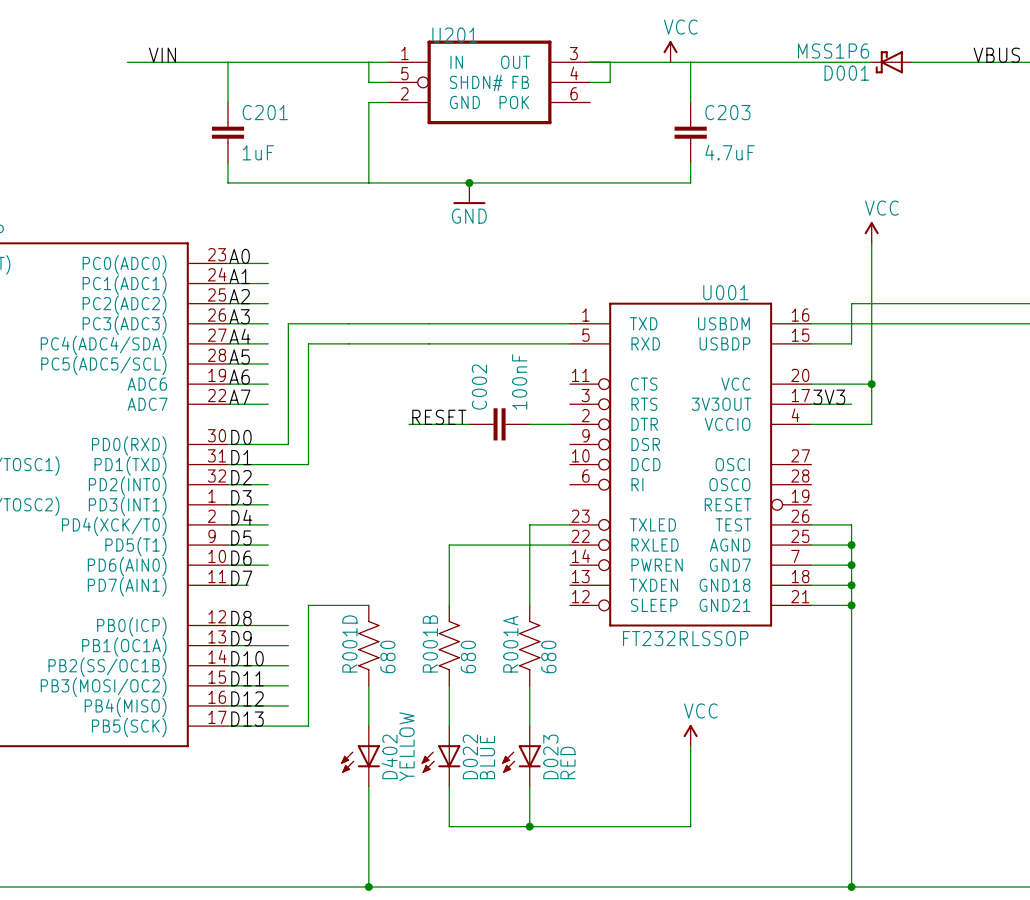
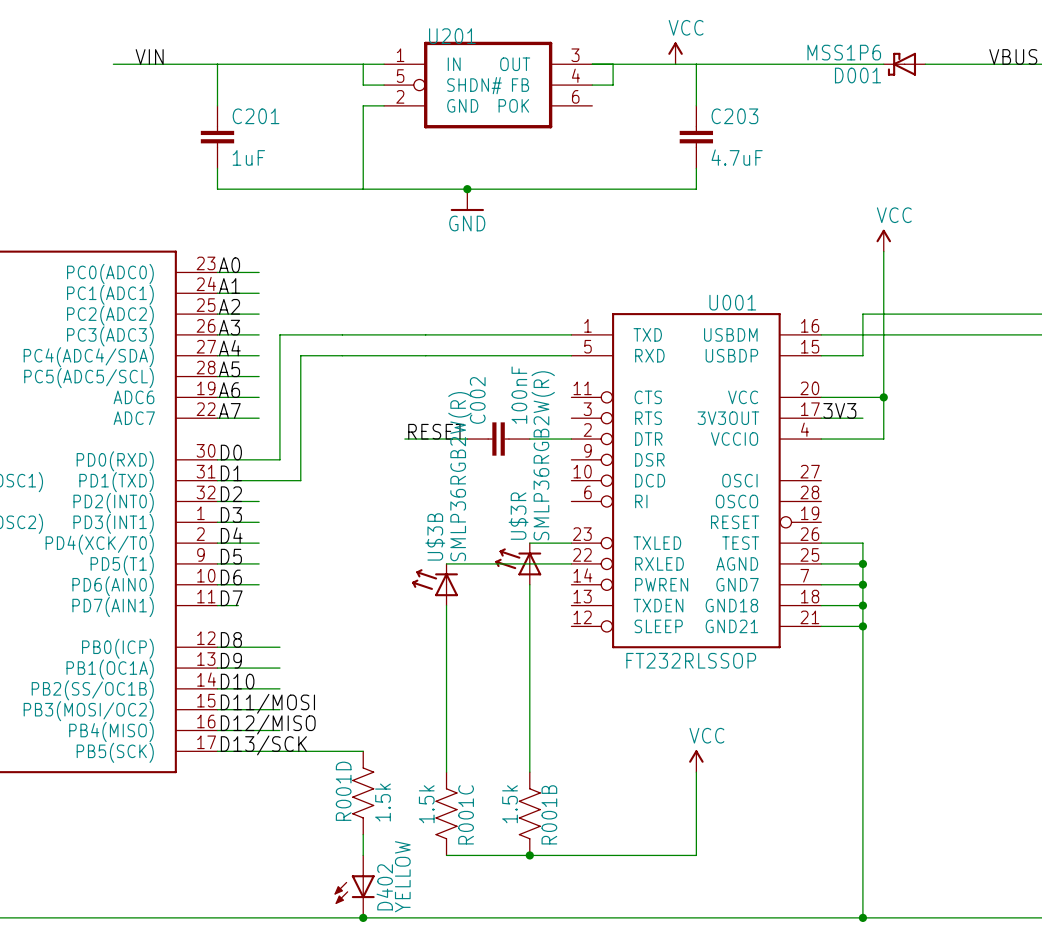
U$3R: none -> SMLP36RGB2W(R) (518, 563)
U$3B: none -> SMLP36RGB2W(R) (435, 584)
wire: (368, 605) (308, 605) (308, 726) -> none
wire: none -> (446, 626) (446, 709)
wire: none -> (529, 626) (529, 709)
R001B name position: R001B (430, 643) -> R001B (549, 814)
R001D position: (368, 645) -> (363, 792)
R001B position: (449, 645) -> (529, 813)
R001A: 680 (529, 645) -> none
R001D value: 680 (387, 656) -> 1.5k (383, 802)
R001B value: 680 (468, 656) -> 1.5k (510, 804)
label: D11 (247, 678) -> D11/MOSI (267, 703)
wire: (368, 685) (368, 726) -> (300, 751) (363, 751)
label: D12 (247, 698) -> D12/MISO (268, 724)
label: D13 (247, 719) -> D13/SCK (263, 745)
D402 position: (360, 756) -> (354, 886)
D022: BLUE (440, 756) -> none
D023: RED (521, 756) -> none
wire: (449, 786) (449, 826) -> none
R001C: none -> 1.5k (446, 813)
wire: (529, 786) (529, 826) -> none

